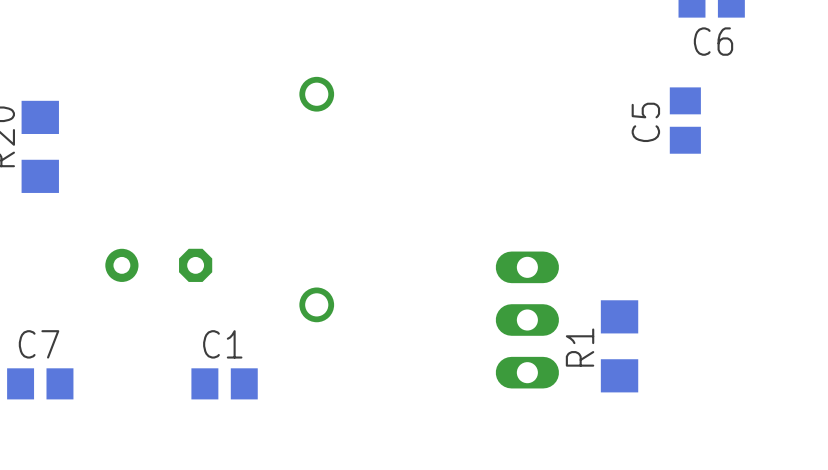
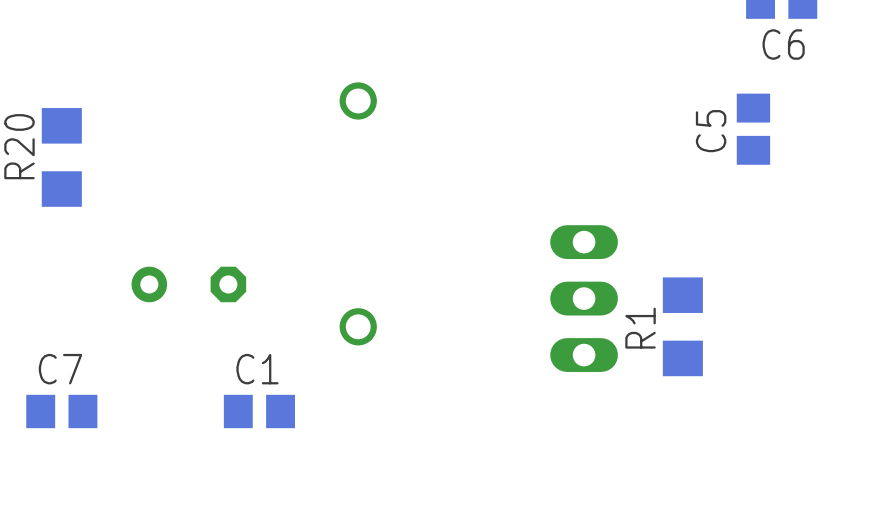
part position: (527, 320) -> (584, 298)
R1 position: (619, 346) -> (682, 326)

